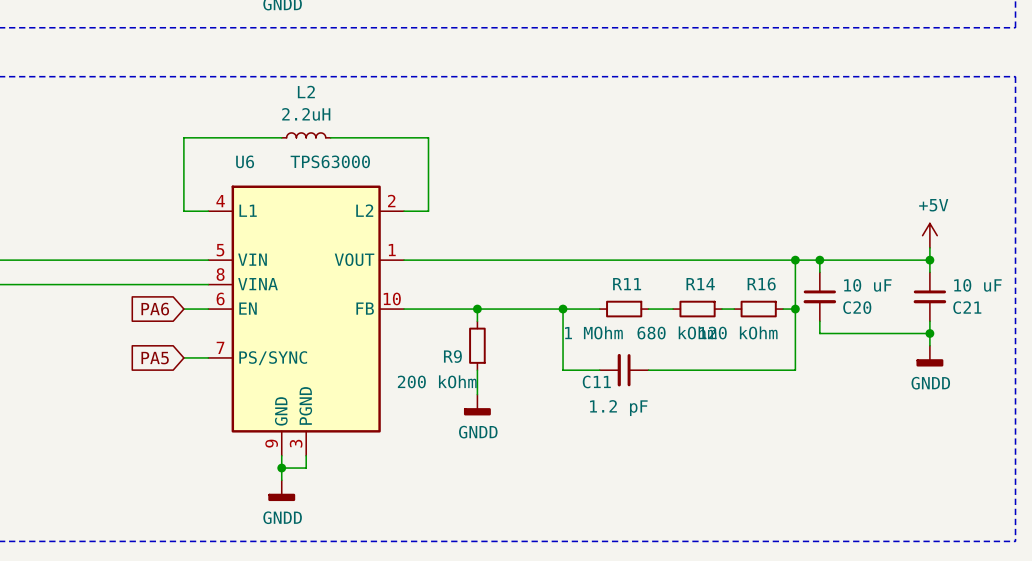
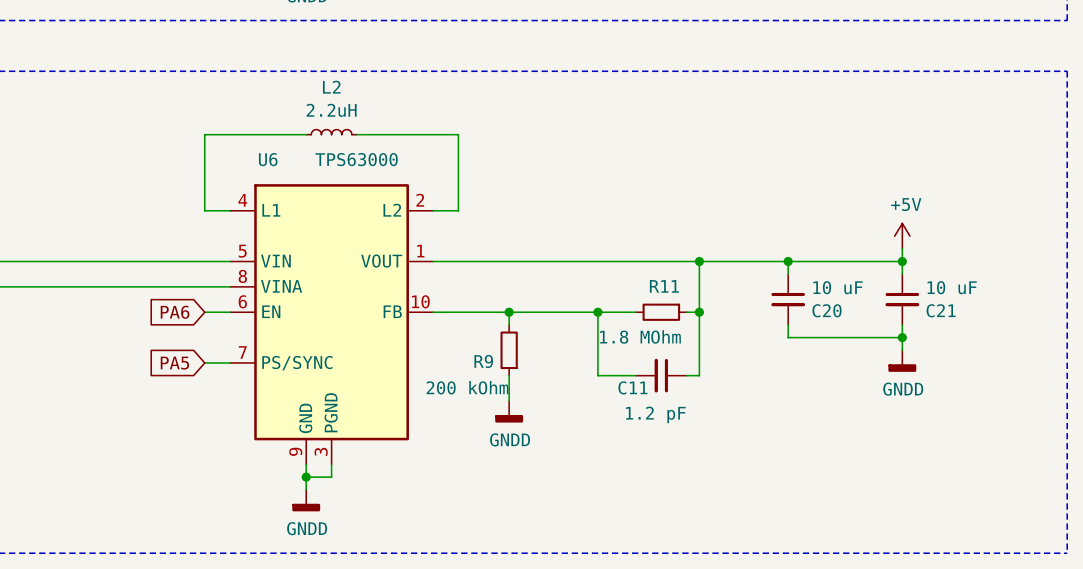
power symbol position: +5V (929, 235) -> +5V (902, 236)
wire: (929, 247) (929, 272) -> (902, 248) (902, 274)
junction: none -> (699, 261)
junction: none -> (788, 261)
wire: (795, 260) (795, 370) (660, 370) -> (699, 261) (699, 375)
junction: (795, 260) -> none
wire: (819, 260) (819, 272) -> (788, 261) (788, 274)
junction: (819, 260) -> none
wire: (856, 260) (929, 260) -> none
junction: none -> (902, 261)
junction: (929, 260) -> none
C20 position: (819, 296) -> (788, 299)
C21 position: (929, 296) -> (902, 299)
wire: (660, 309) (673, 309) -> none
junction: none -> (699, 312)
R14: 680 kOhm (697, 309) -> none
wire: (722, 309) (734, 309) -> none
R16: 120 kOhm (758, 309) -> none
wire: (783, 309) (795, 309) -> none
junction: (795, 309) -> none
wire: (819, 321) (819, 333) -> (788, 324) (788, 337) (864, 337)
wire: (929, 321) (929, 345) -> (902, 324) (902, 350)
R11 value: 1 MOhm (593, 332) -> 1.8 MOhm (640, 336)
wire: (856, 333) (929, 333) -> none
junction: none -> (902, 337)
junction: (929, 333) -> none
power symbol position: GNDD (929, 356) -> GNDD (902, 361)

